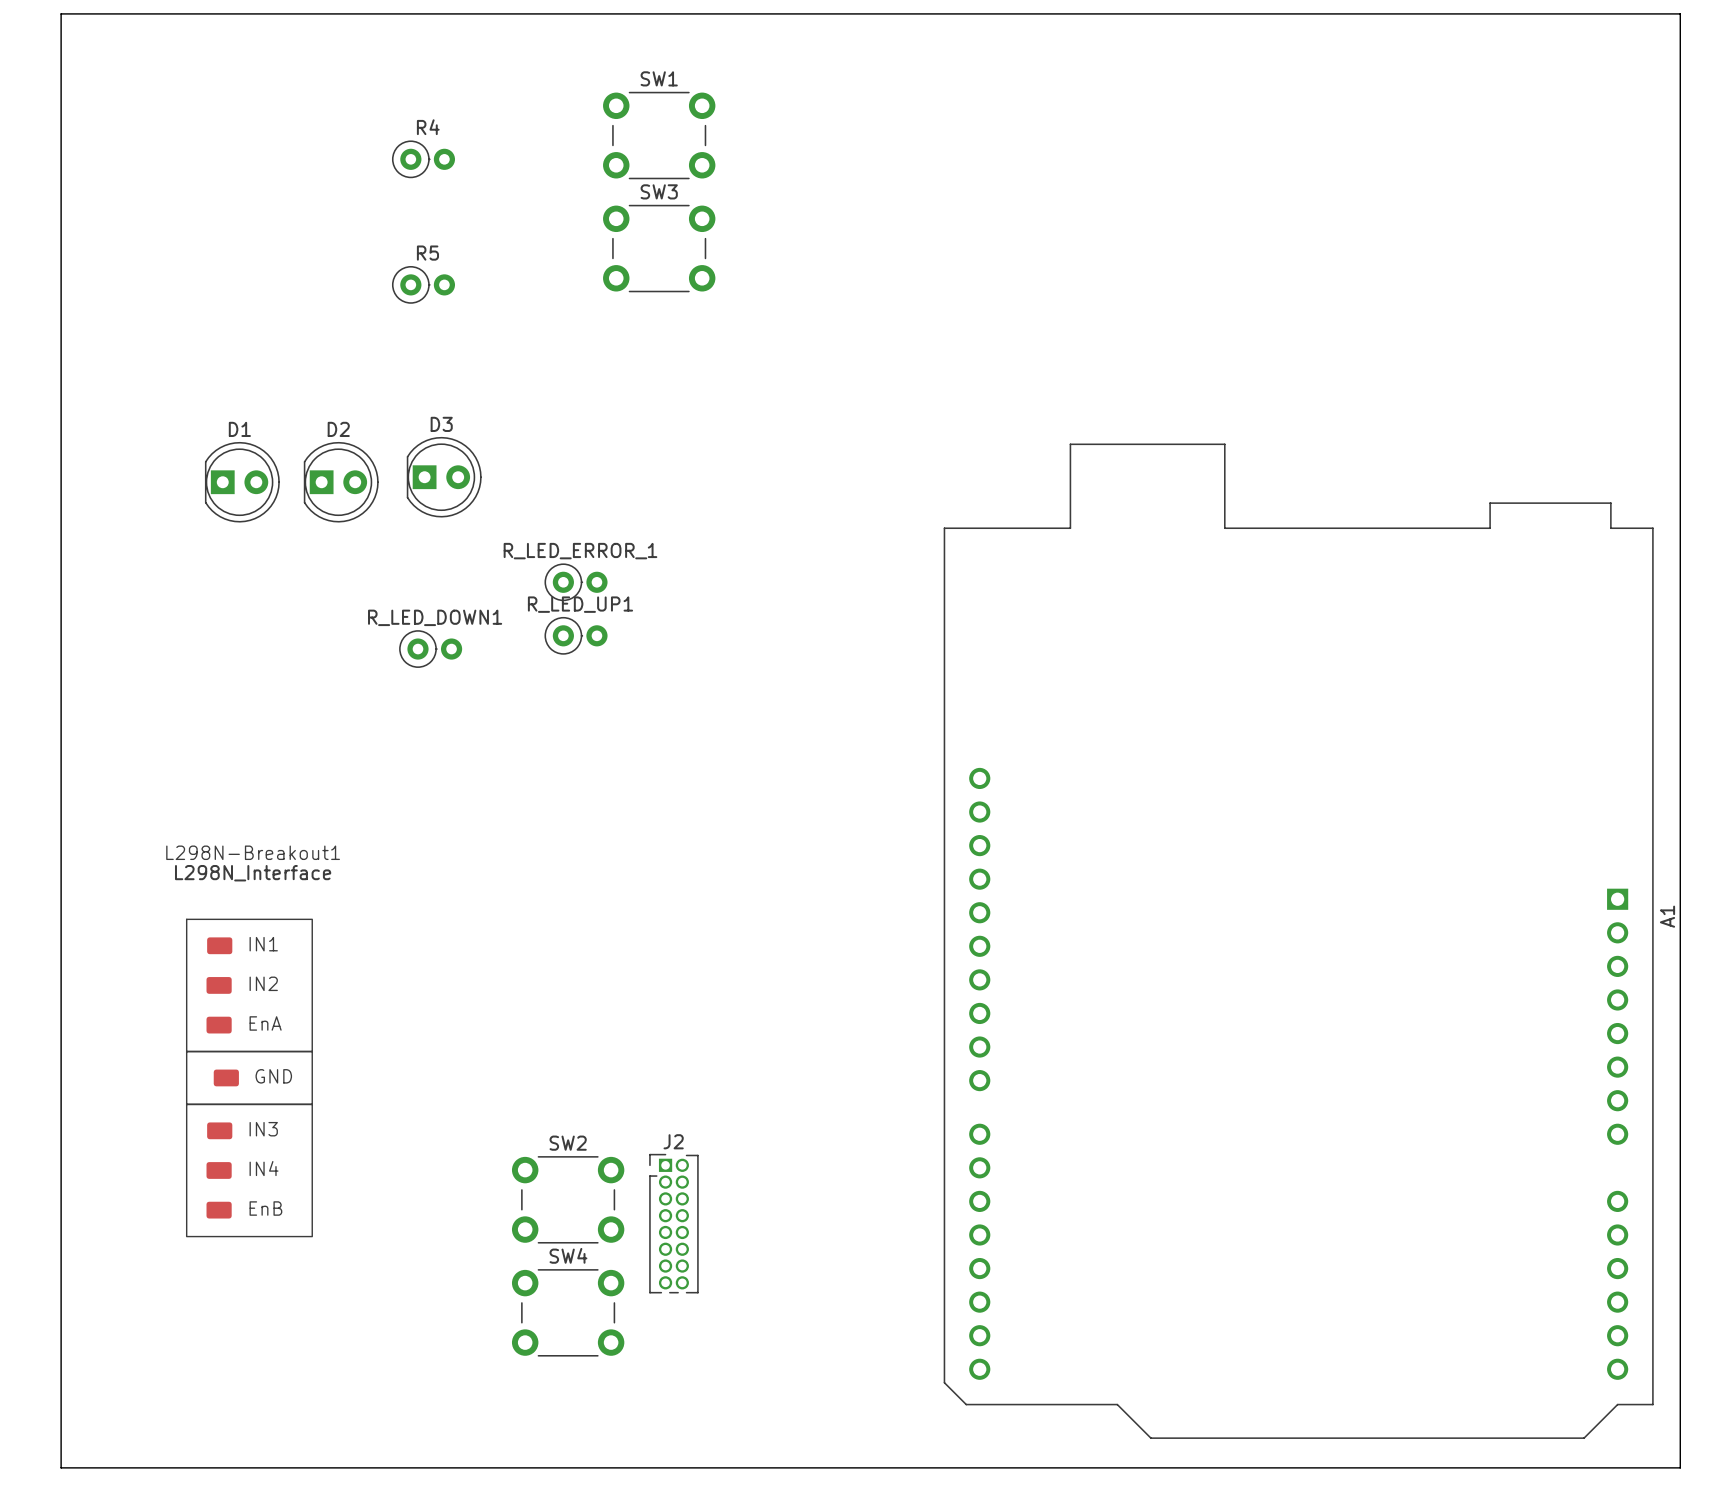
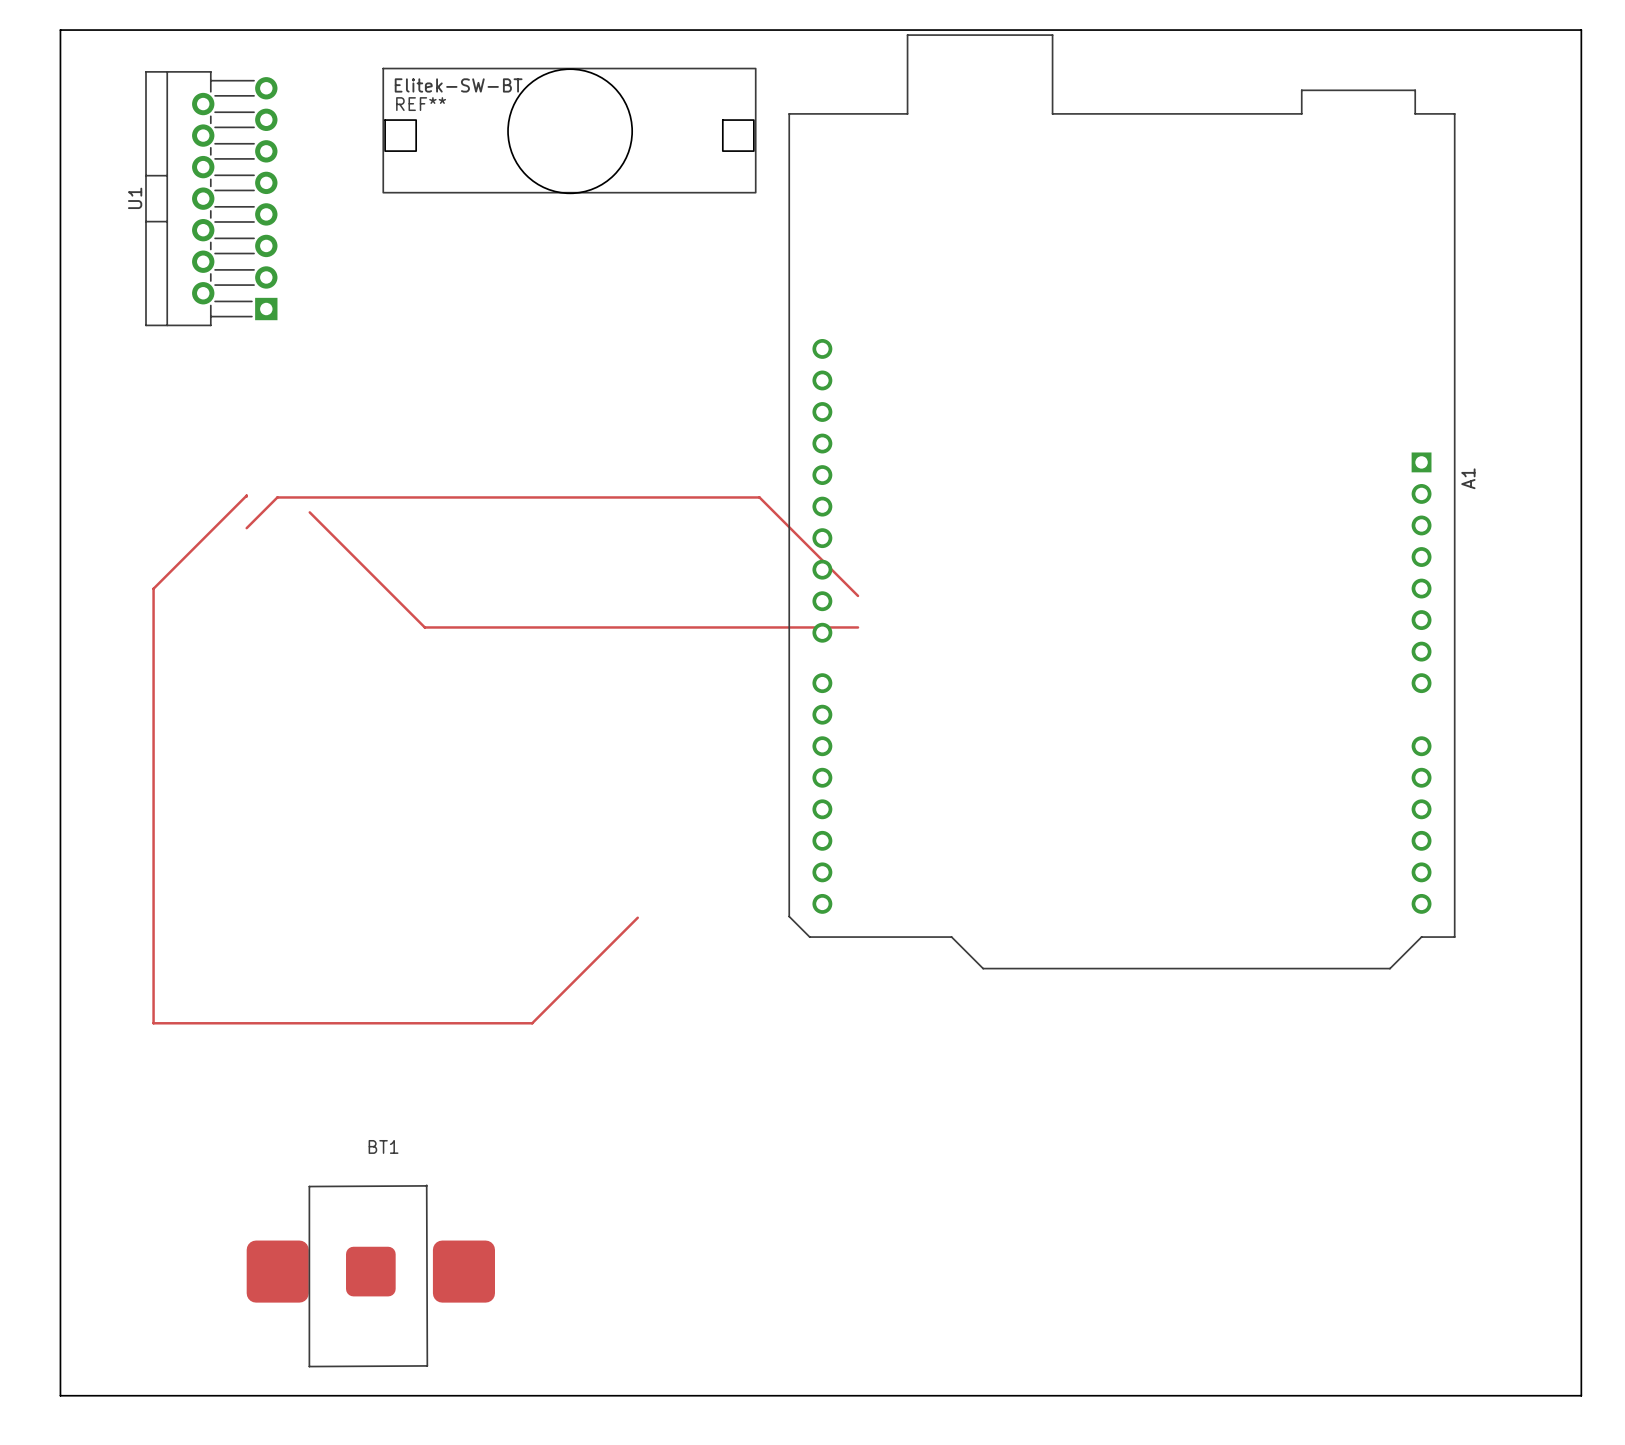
REF**: none -> Elitek-SW-BT (569, 130)
SW1: (659, 135) -> none
R4: (423, 159) -> none
U1: none -> (211, 198)
SW3: (659, 248) -> none
R5: (423, 284) -> none
D3: (444, 477) -> none
D1: (242, 482) -> none
D2: (341, 482) -> none
track: none -> (246, 496) (153, 588) (153, 1023) (532, 1023) (637, 917)
track: none -> (309, 512) (424, 627) (858, 627)
track: none -> (246, 528) (277, 497) (759, 497) (858, 595)
R_LED_ERROR_1: (576, 582) -> none
R_LED_UP1: (576, 635) -> none
R_LED_DOWN1: (430, 649) -> none
A1 position: (1298, 941) -> (1121, 501)
L298N-Breakout1: L298N_Interface (249, 1077) -> none
SW2: (568, 1199) -> none
J2: (673, 1223) -> none
SW4: (568, 1312) -> none
BT1: none -> (370, 1275)

